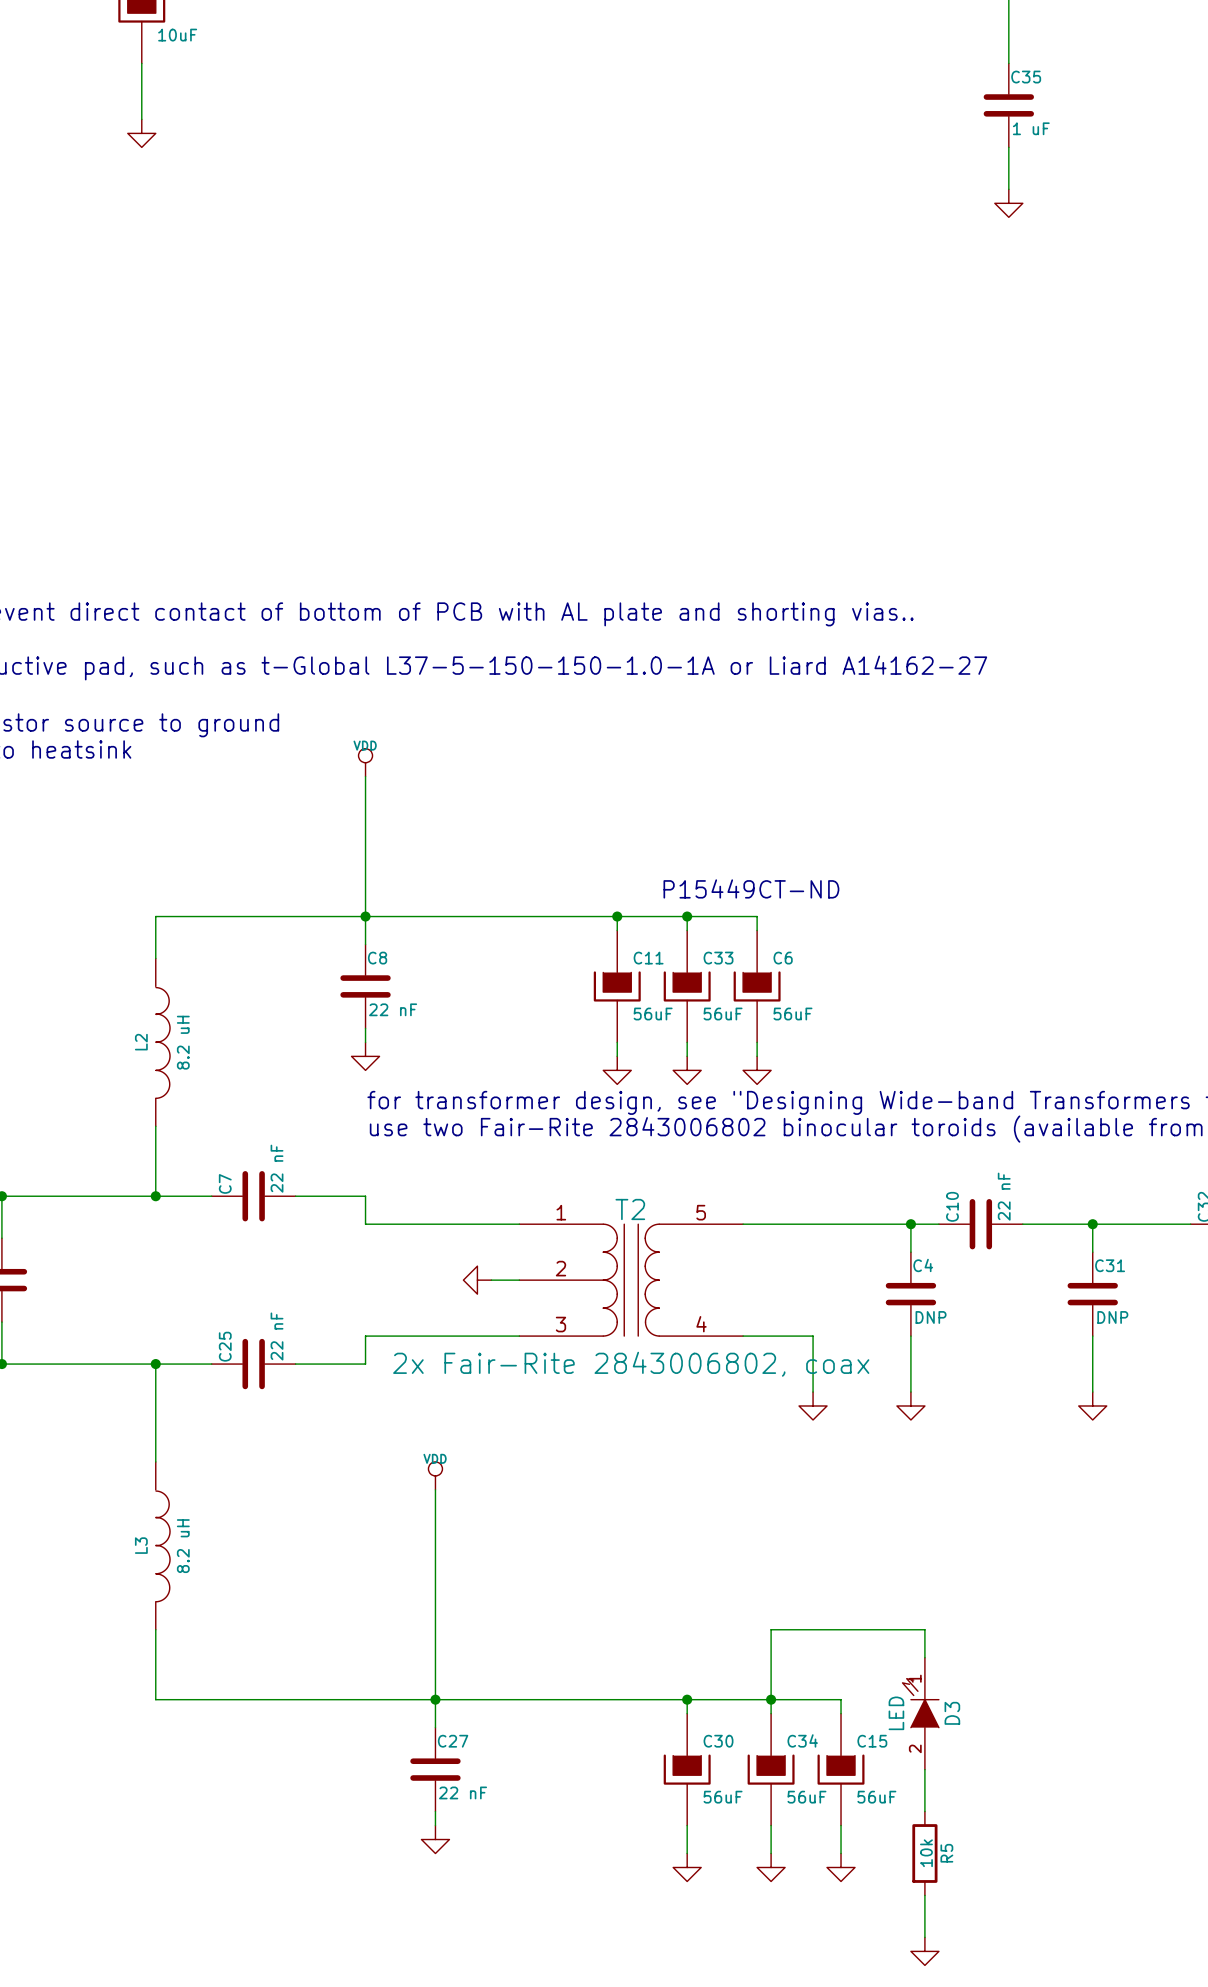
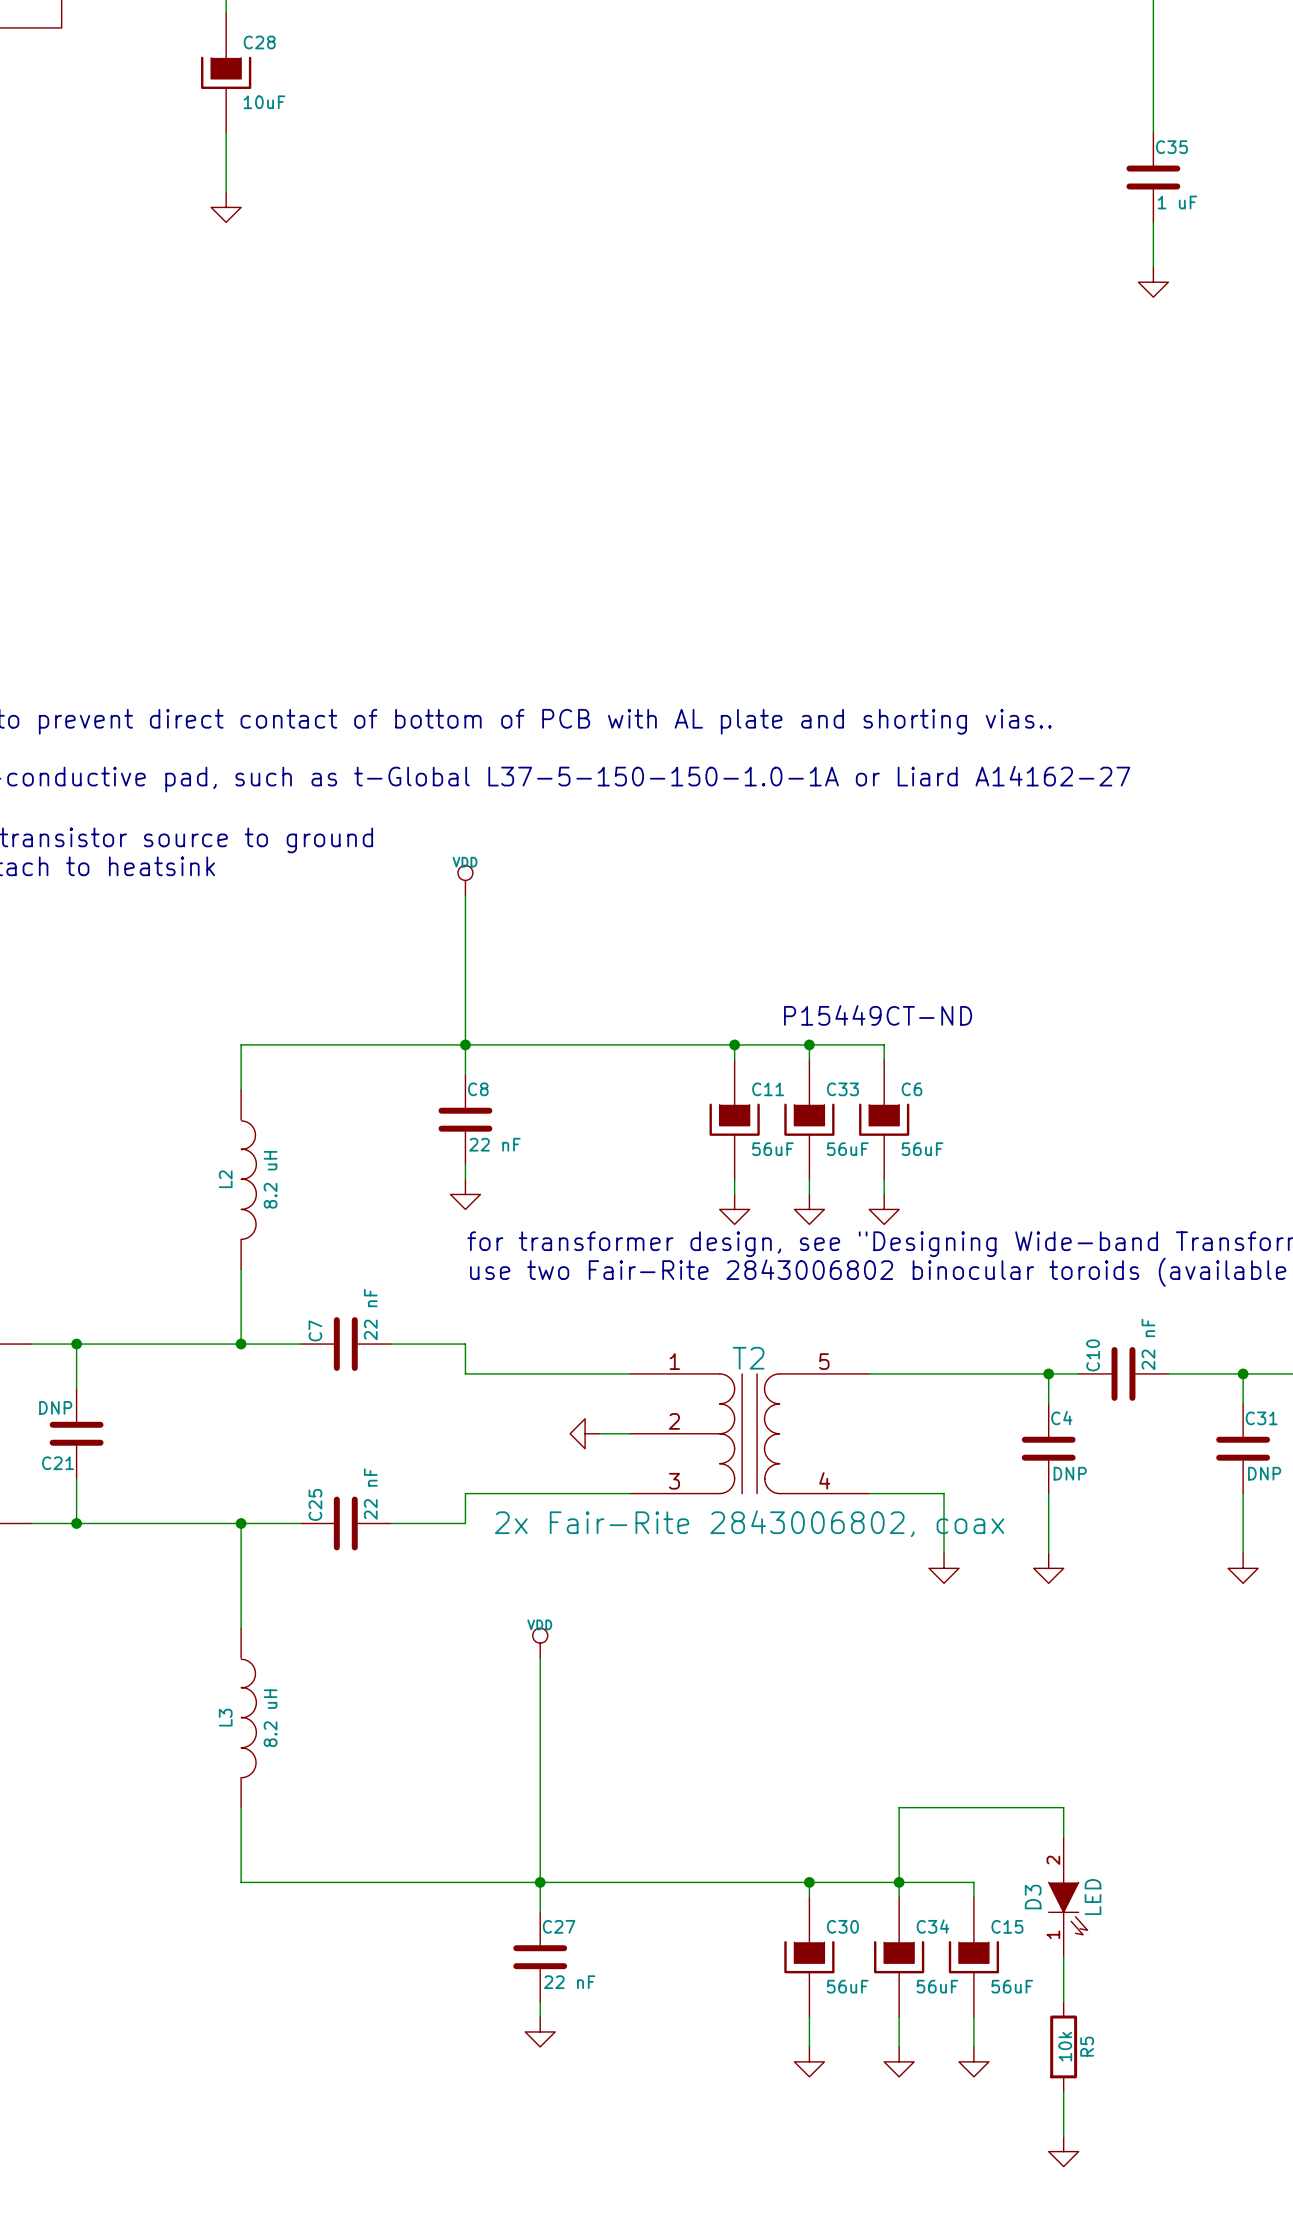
D3 rotation: 0° (920, 1703) -> 180° (1068, 1908)

